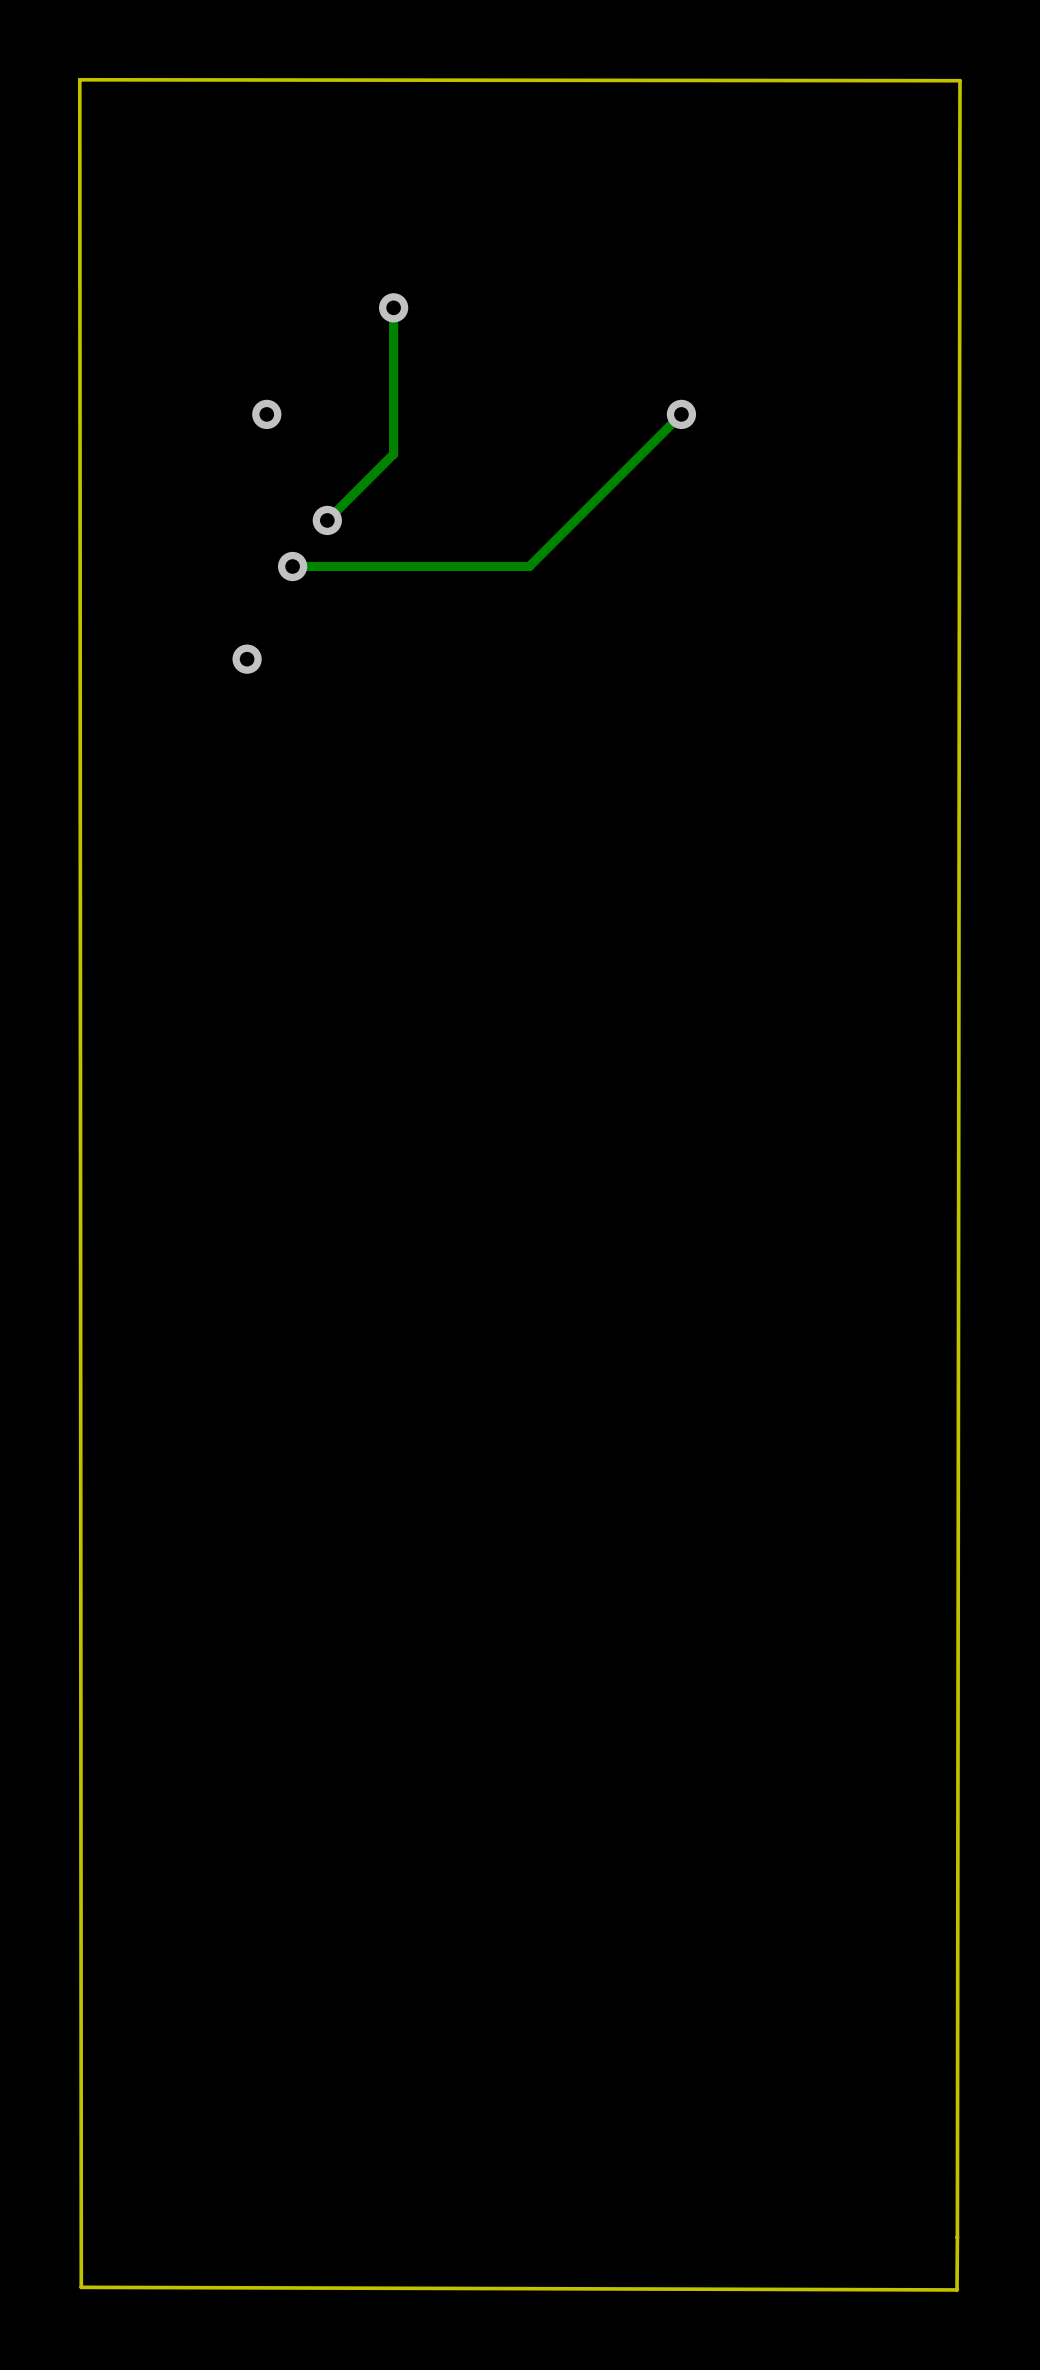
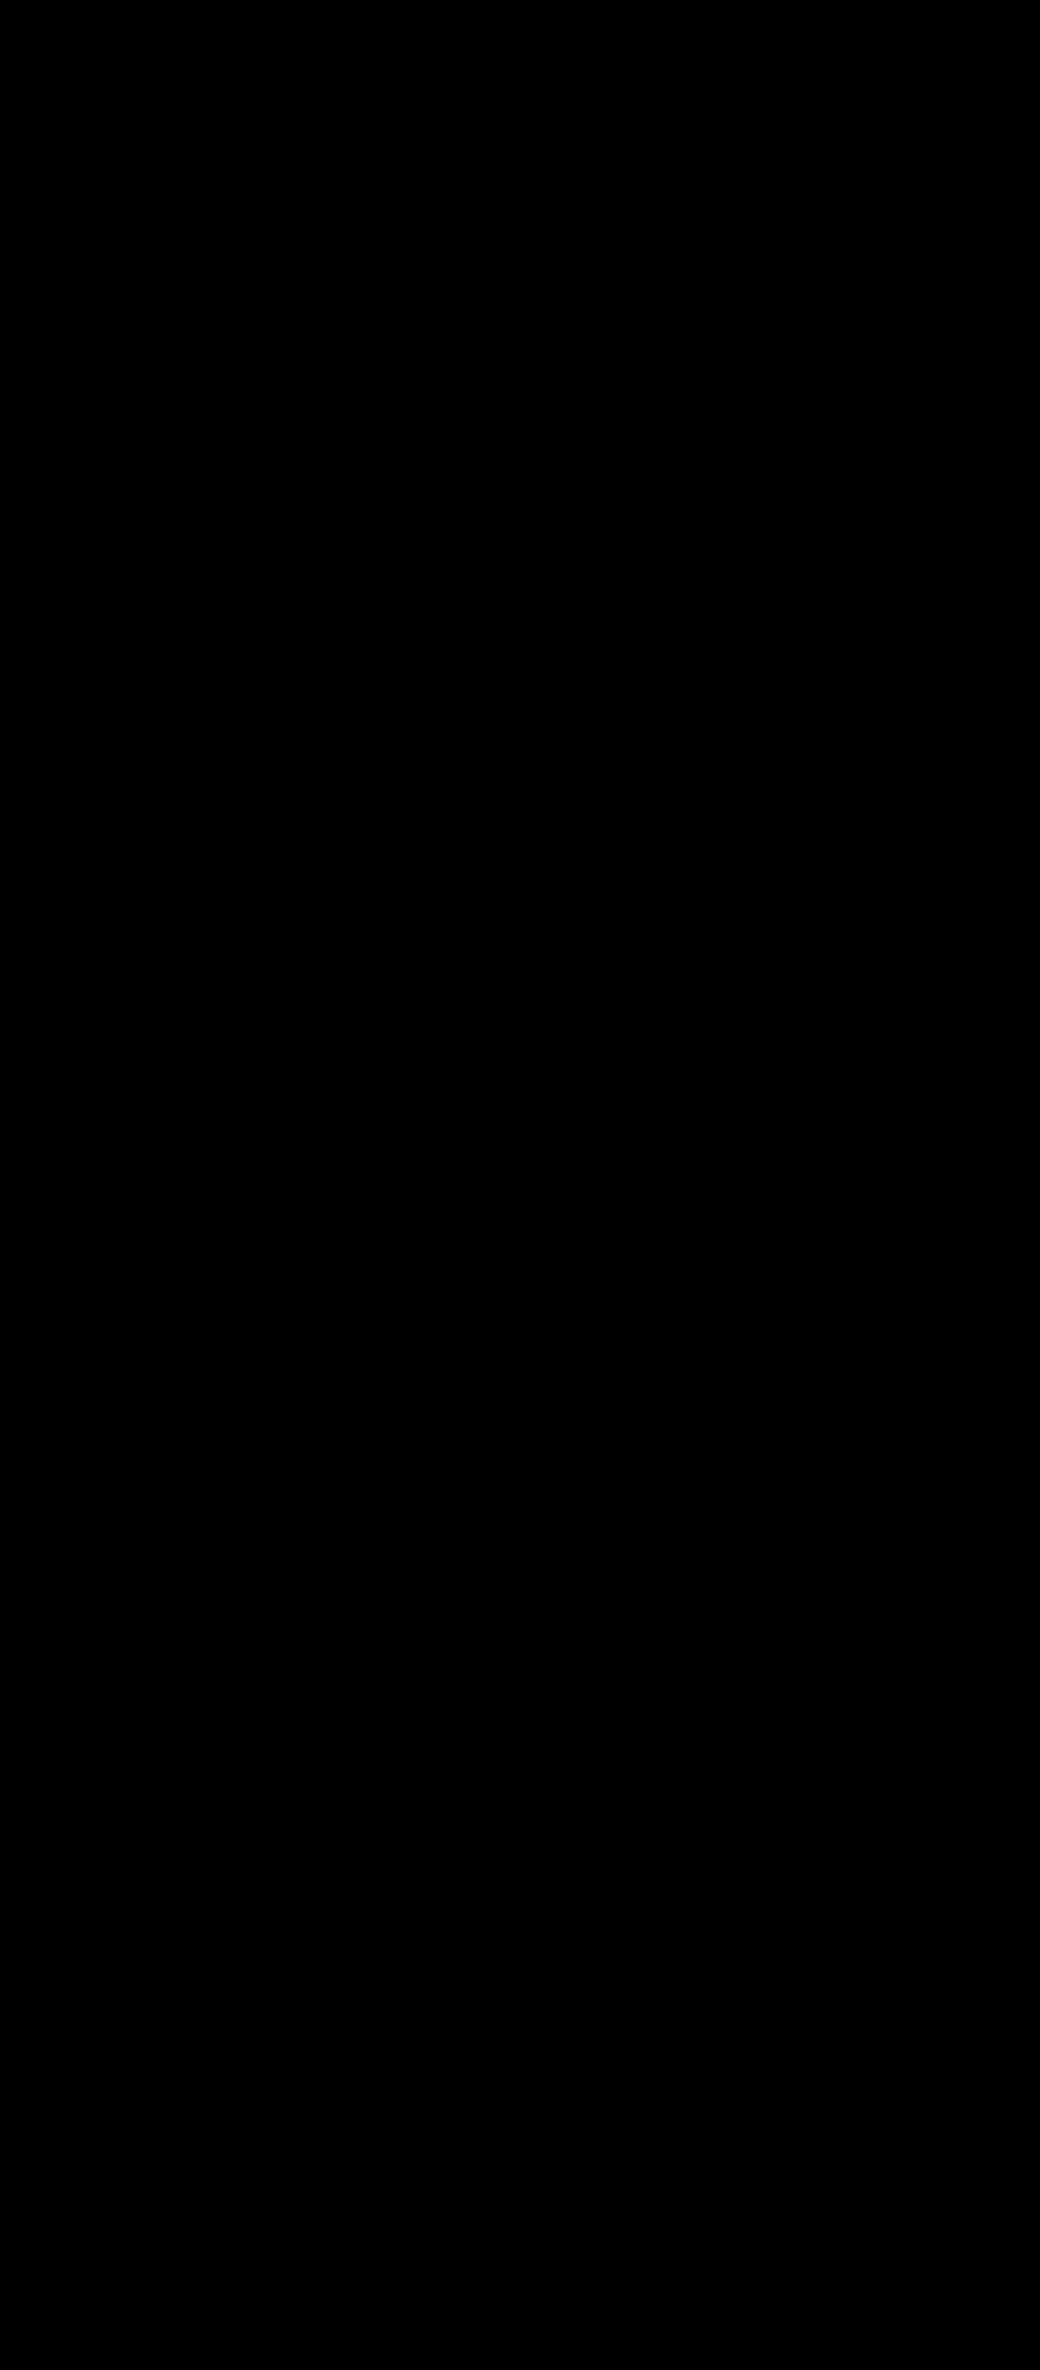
board edge: (79, 79) (81, 2287) (957, 2289) (959, 80) (79, 79) -> none
track: (393, 307) (393, 454) (327, 520) -> none
via: (393, 307) -> none
via: (266, 414) -> none
track: (681, 414) (529, 566) (292, 566) -> none
via: (681, 414) -> none
via: (327, 520) -> none
via: (292, 566) -> none
via: (247, 659) -> none

